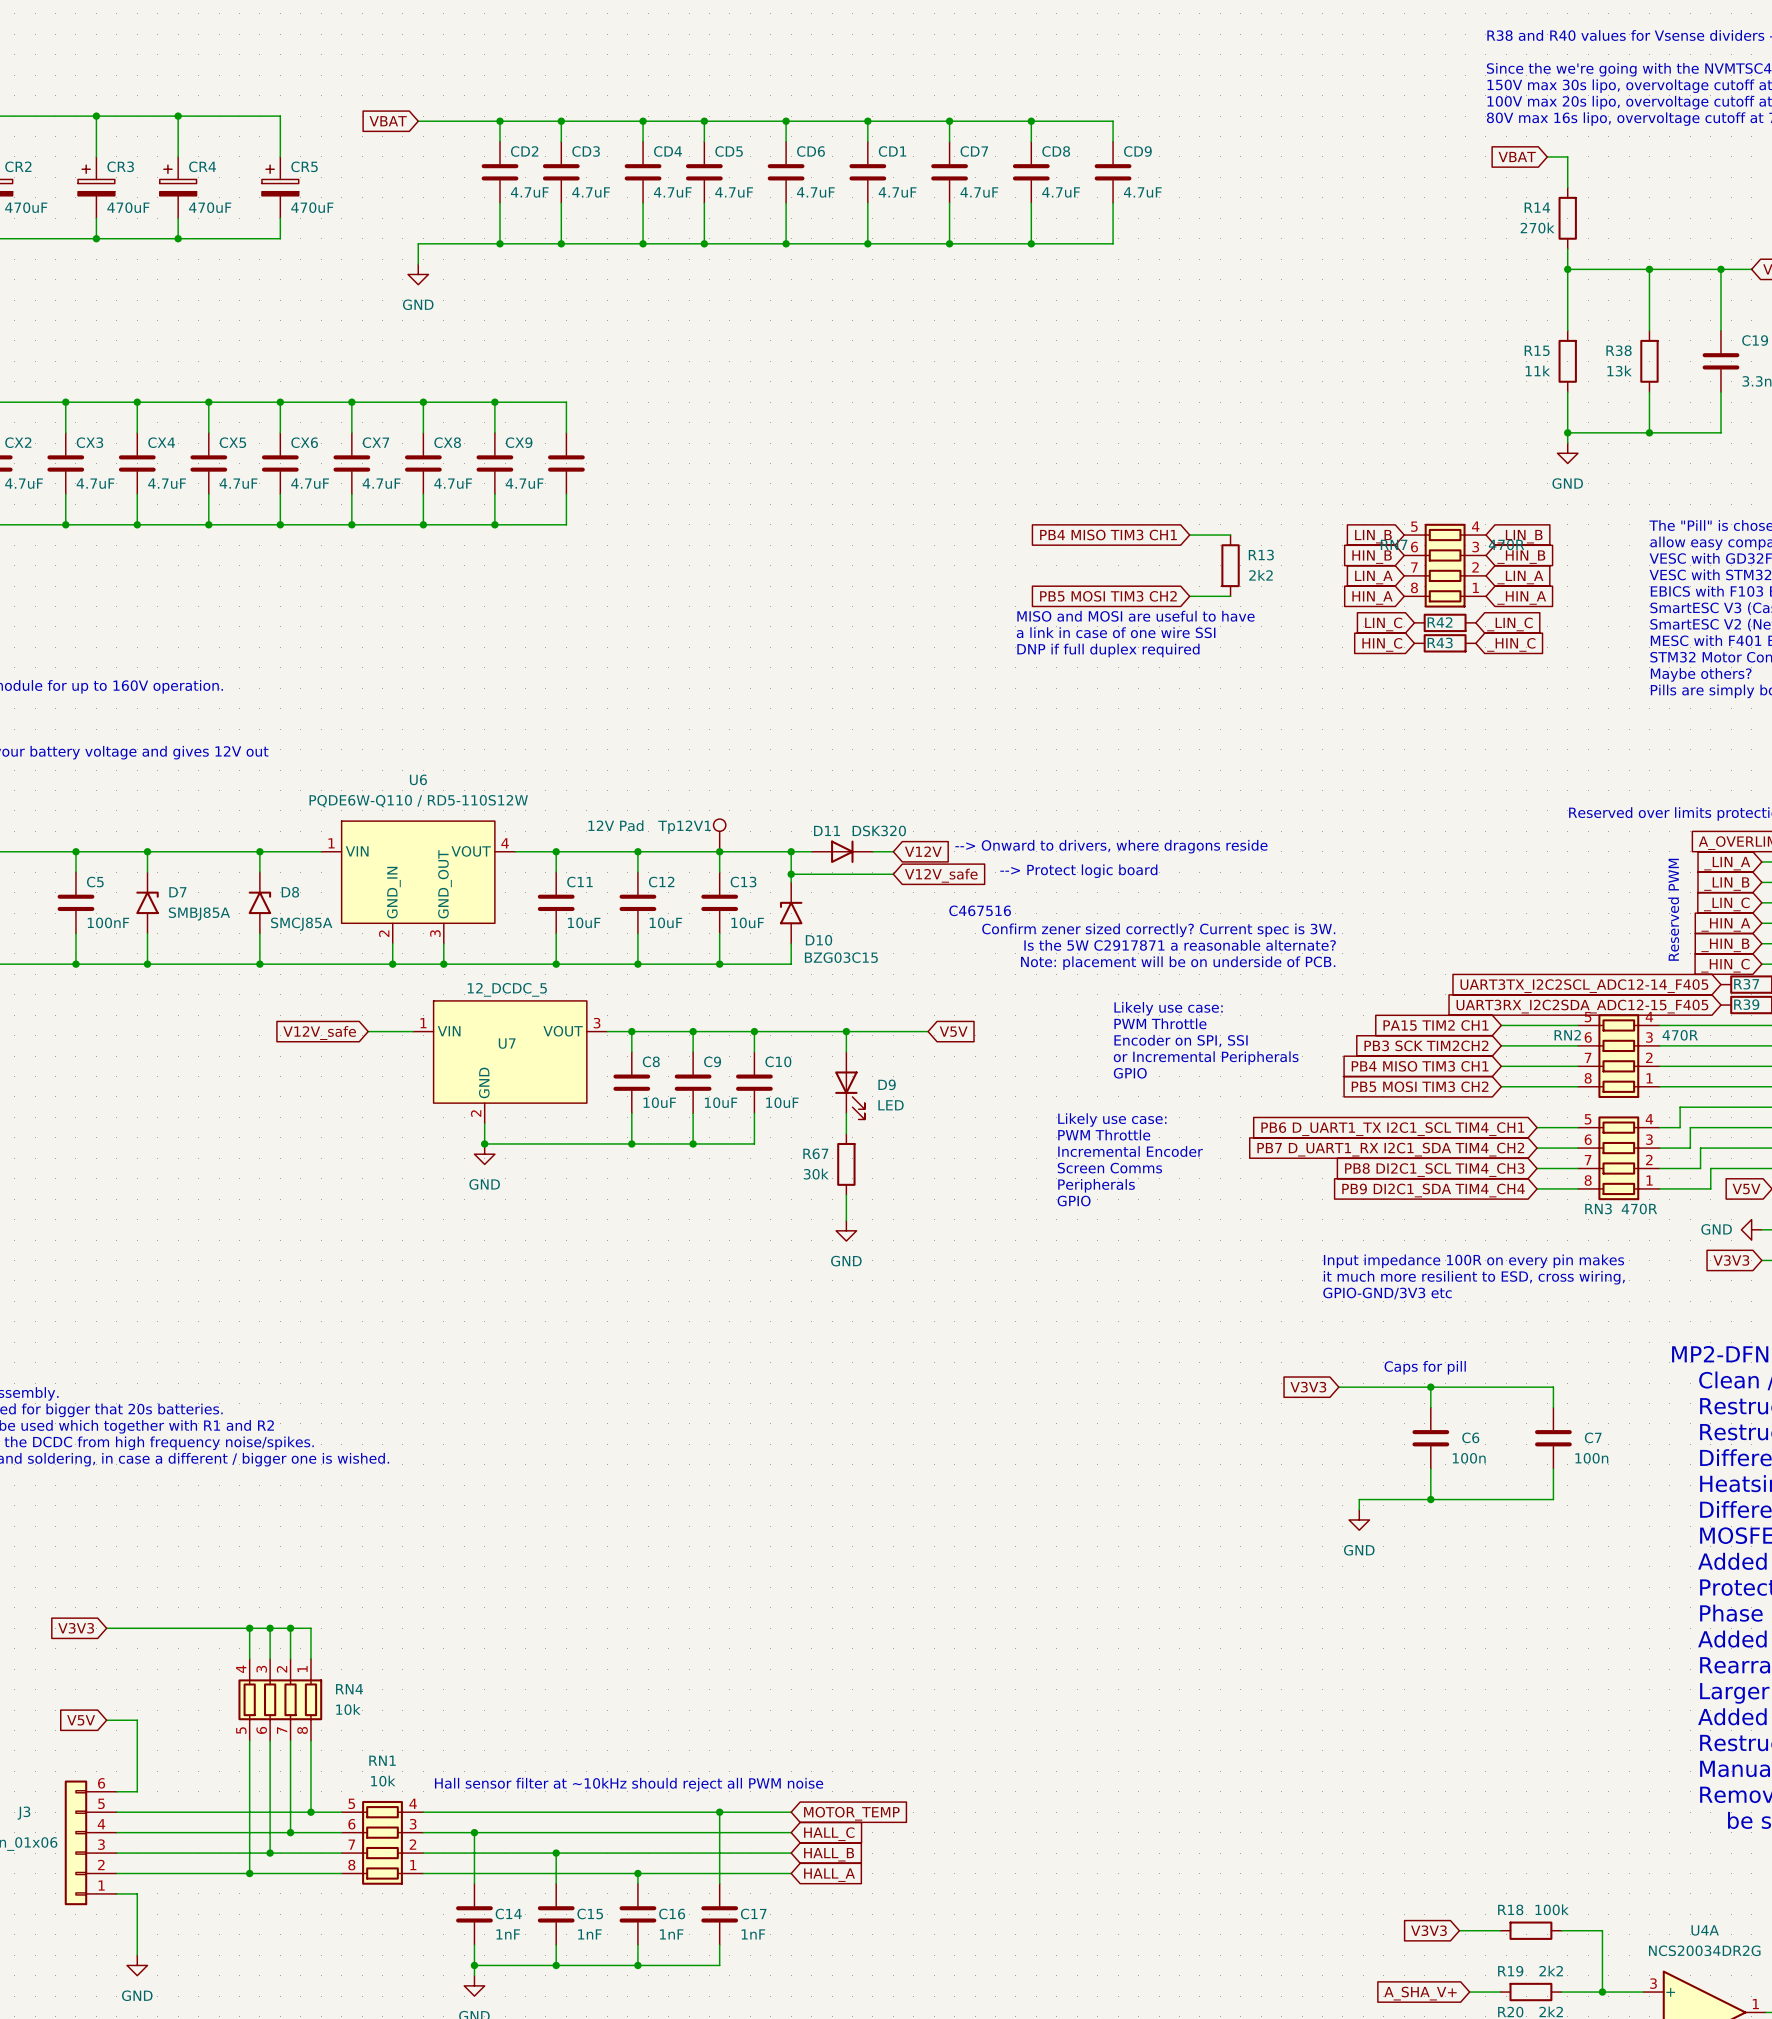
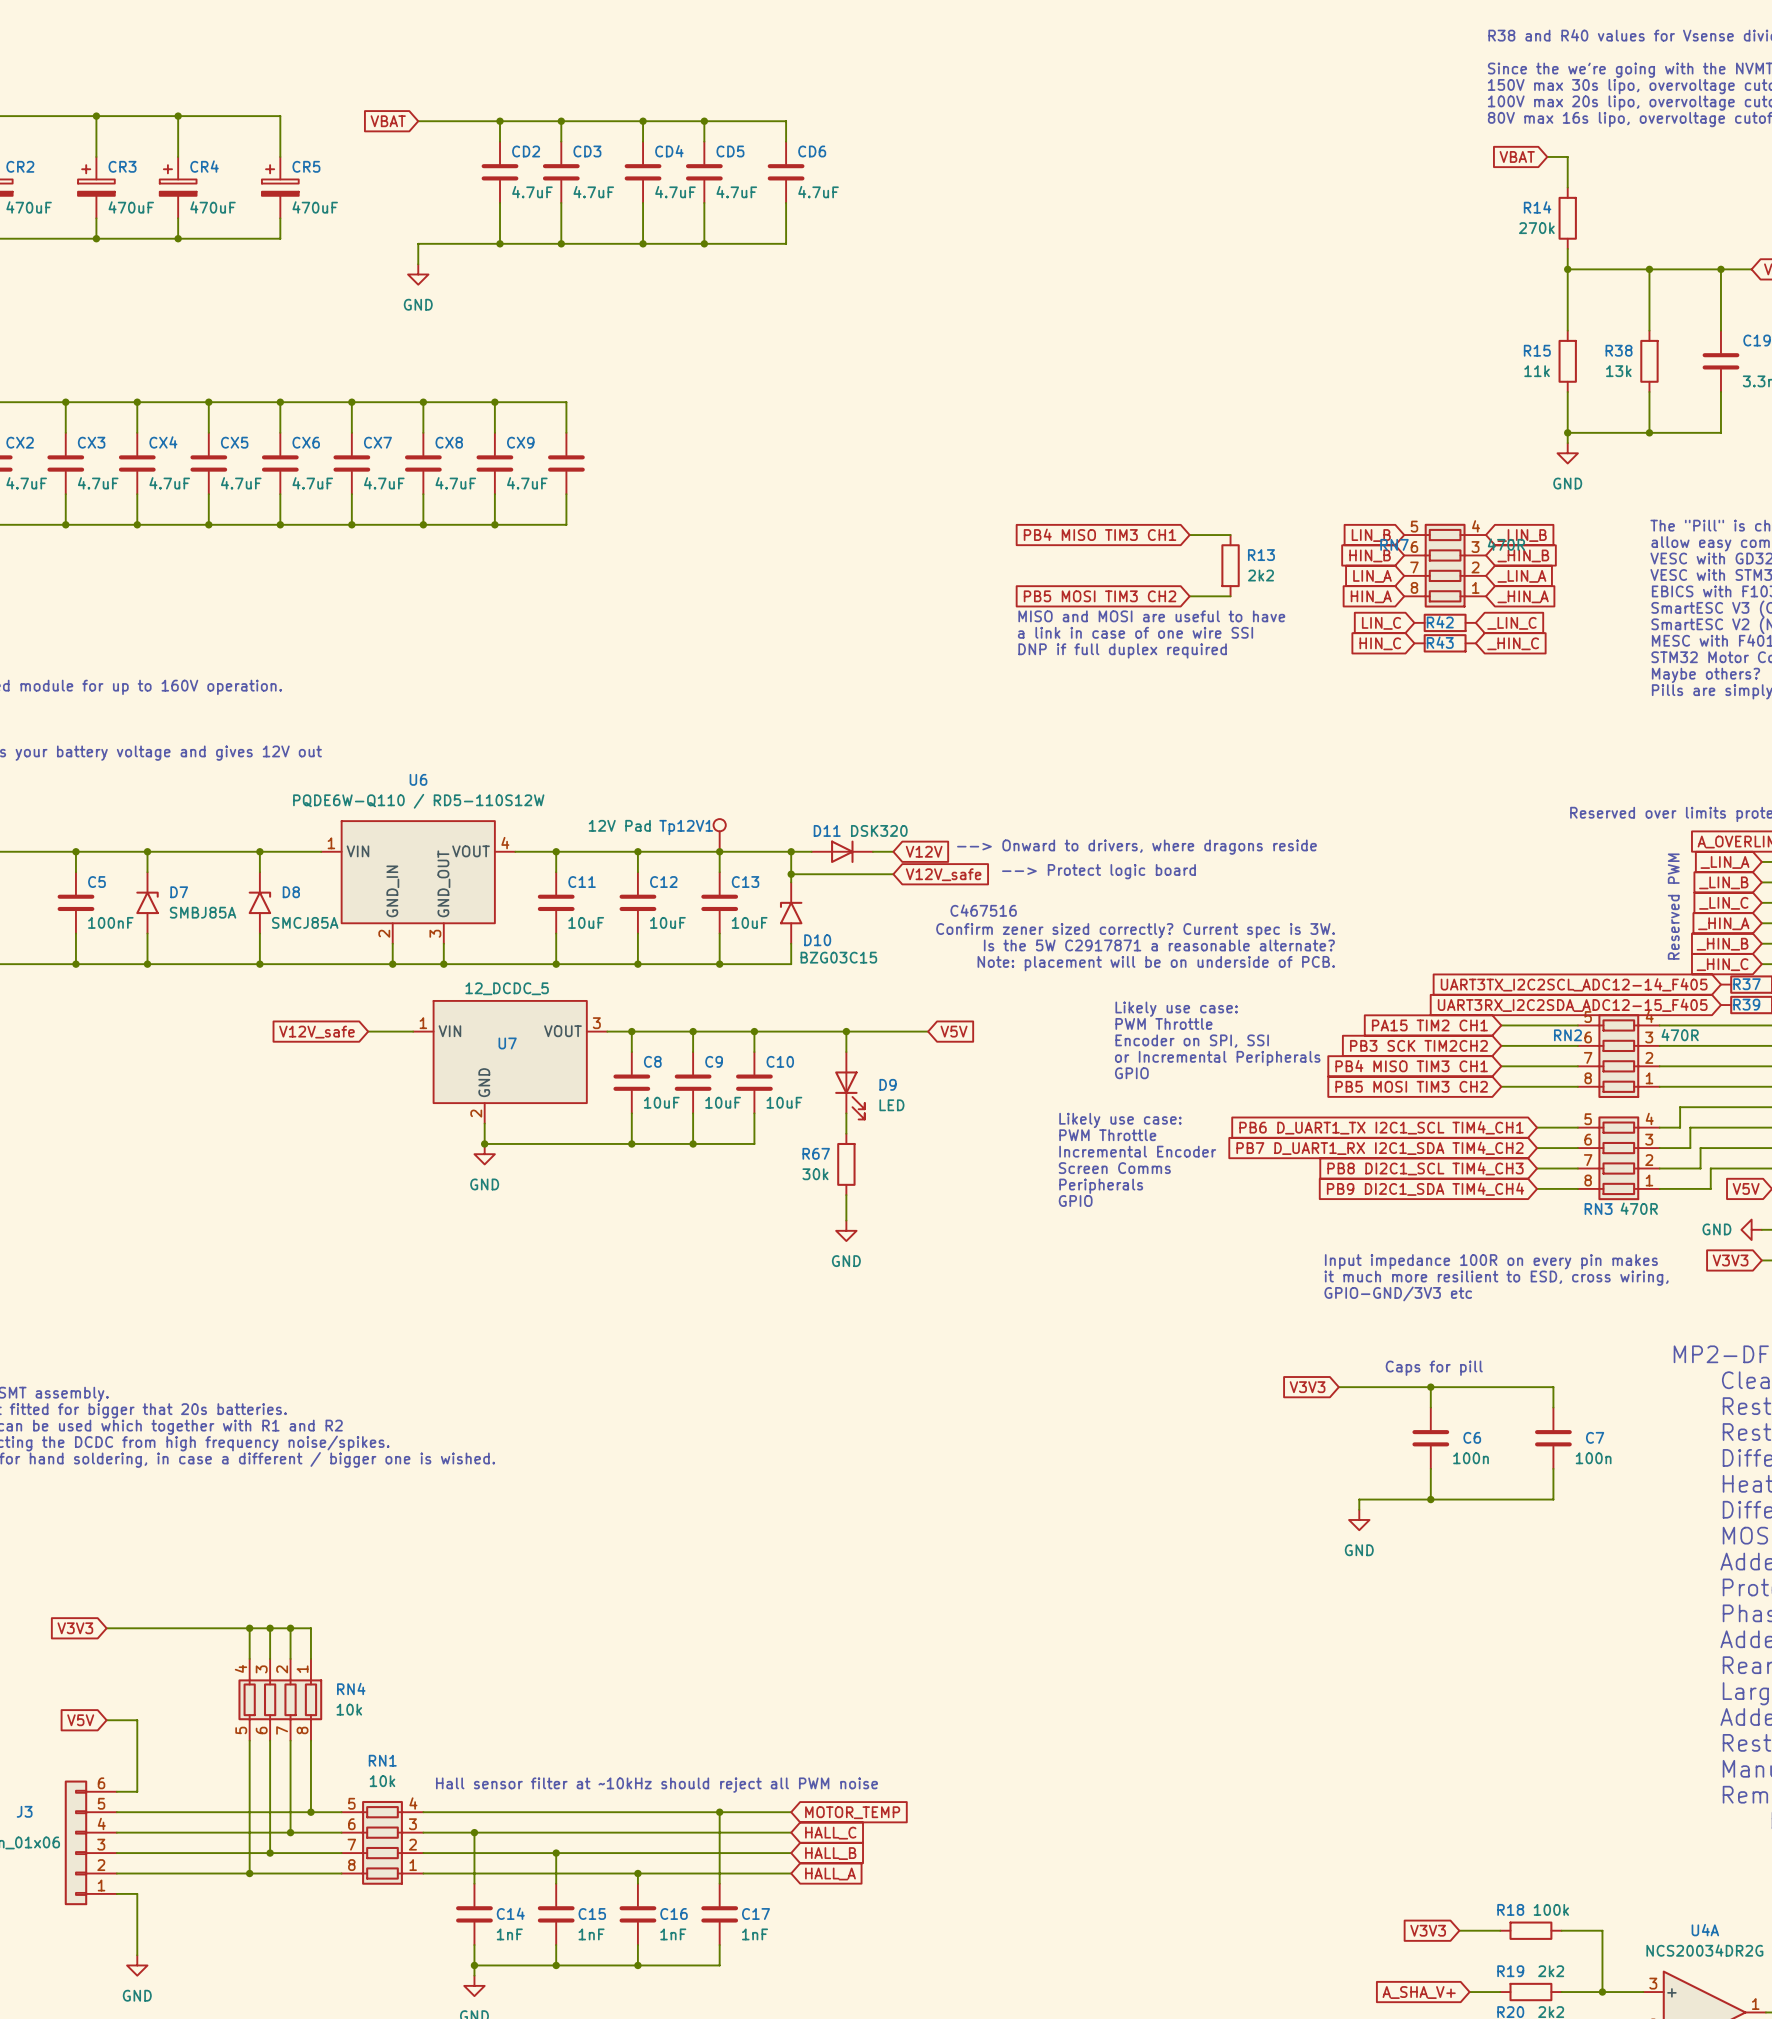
wire: (786, 121) (1113, 121) (1113, 141) -> none
junction: (786, 121) -> none
wire: (867, 121) (867, 141) -> none
junction: (867, 121) -> none
wire: (949, 121) (949, 141) -> none
junction: (949, 121) -> none
wire: (1031, 121) (1031, 141) -> none
junction: (1031, 121) -> none
CD1: 4.7uF (867, 172) -> none
CD7: 4.7uF (949, 172) -> none
CD8: 4.7uF (1031, 172) -> none
CD9: 4.7uF (1113, 172) -> none
wire: (867, 202) (867, 243) -> none
wire: (949, 202) (949, 243) -> none
wire: (1031, 202) (1031, 243) -> none
wire: (1113, 202) (1113, 243) (786, 243) -> none
junction: (786, 243) -> none
junction: (867, 243) -> none
junction: (949, 243) -> none
junction: (1031, 243) -> none

